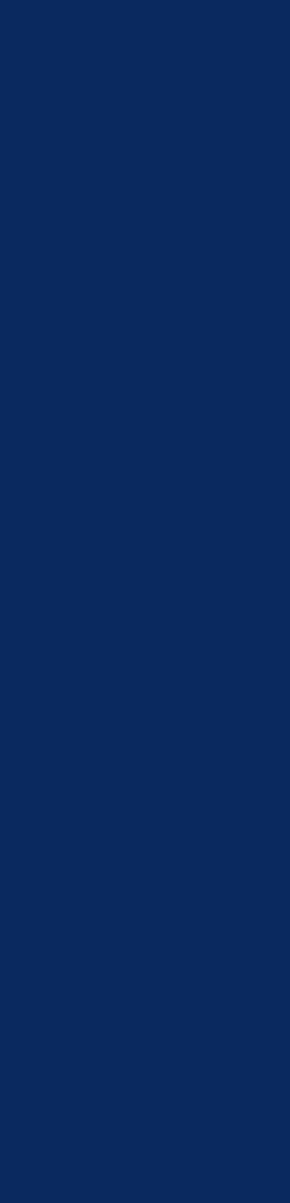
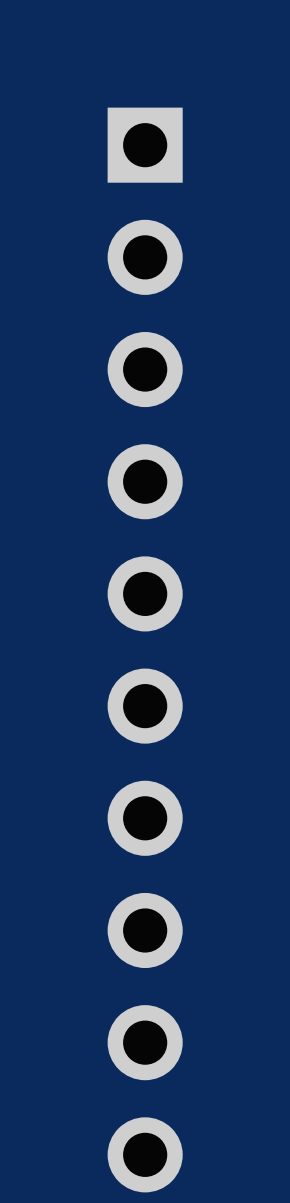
part: none -> (145, 650)

